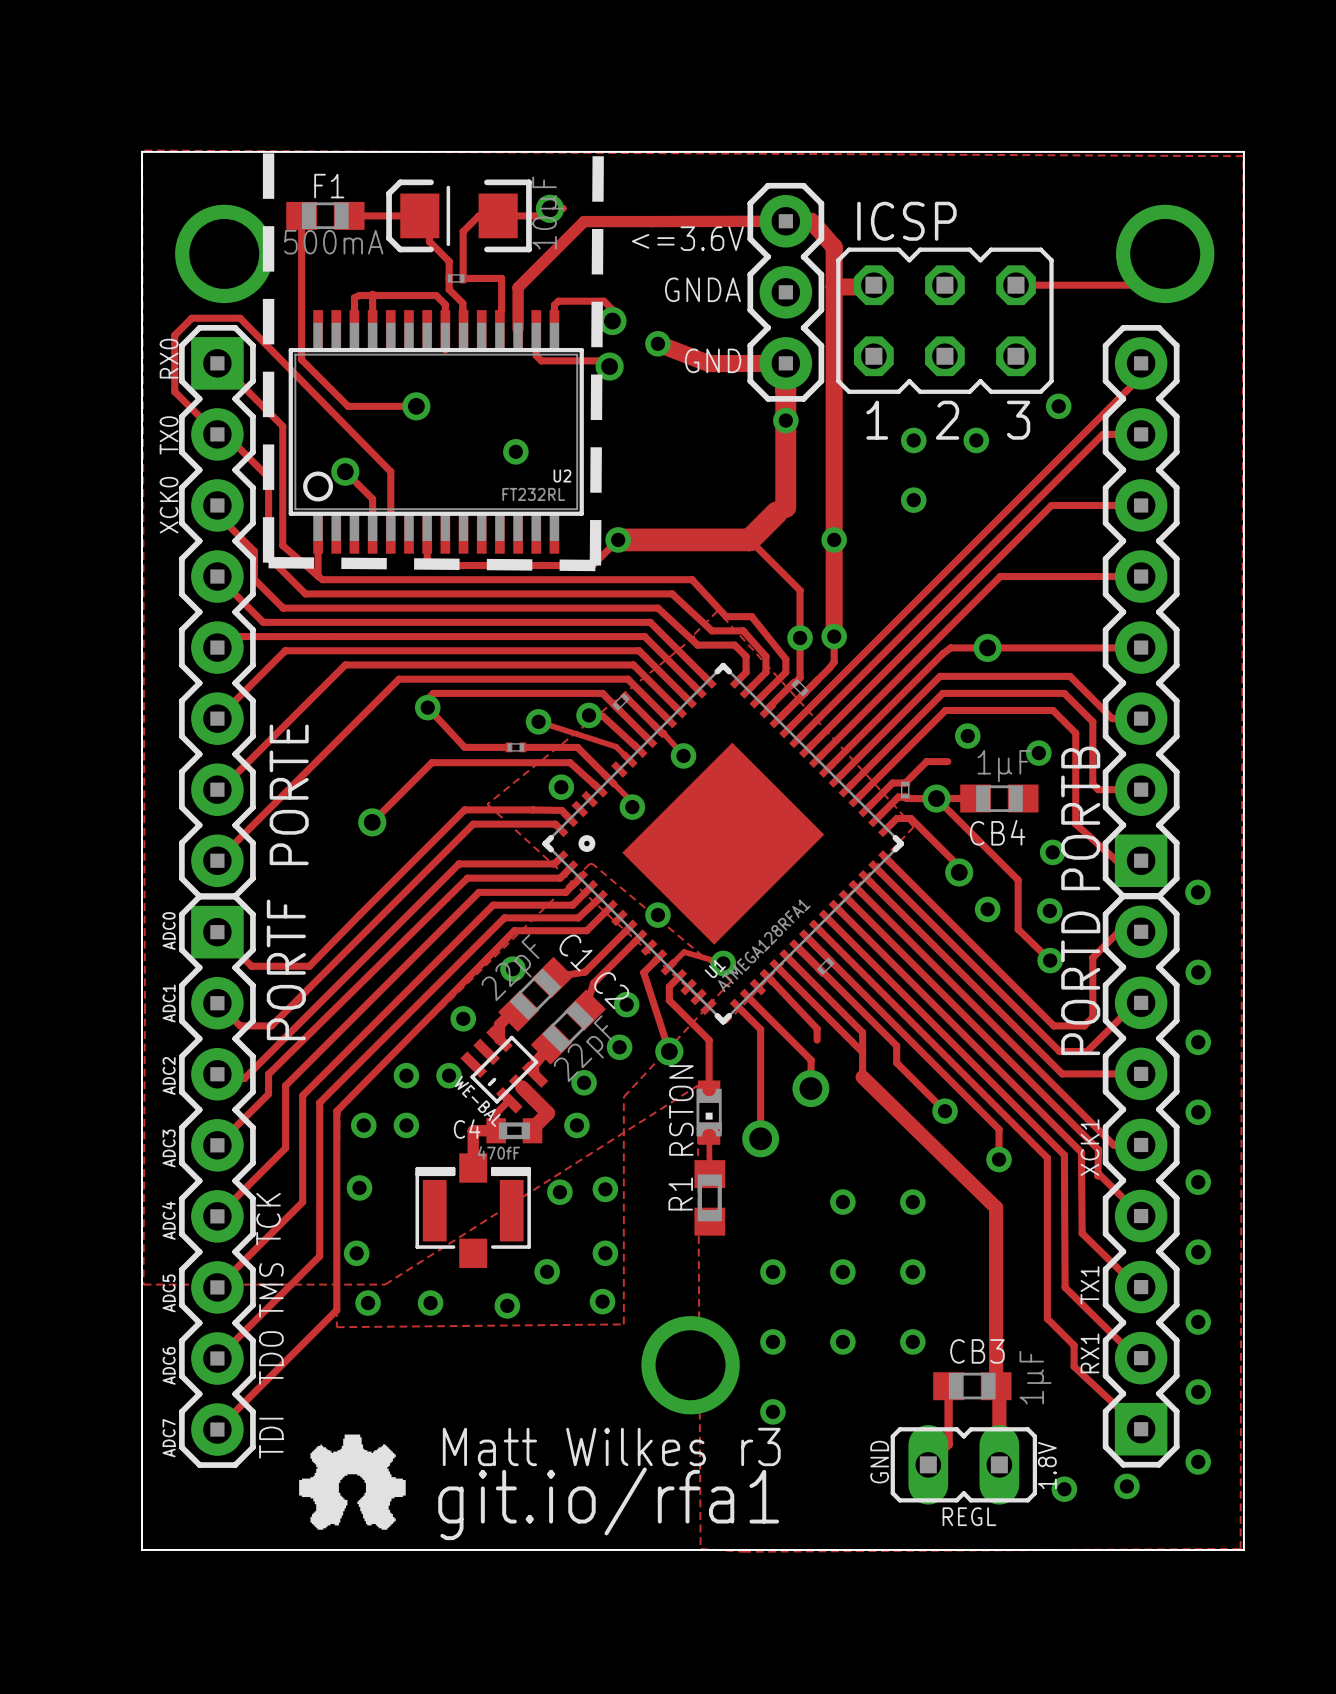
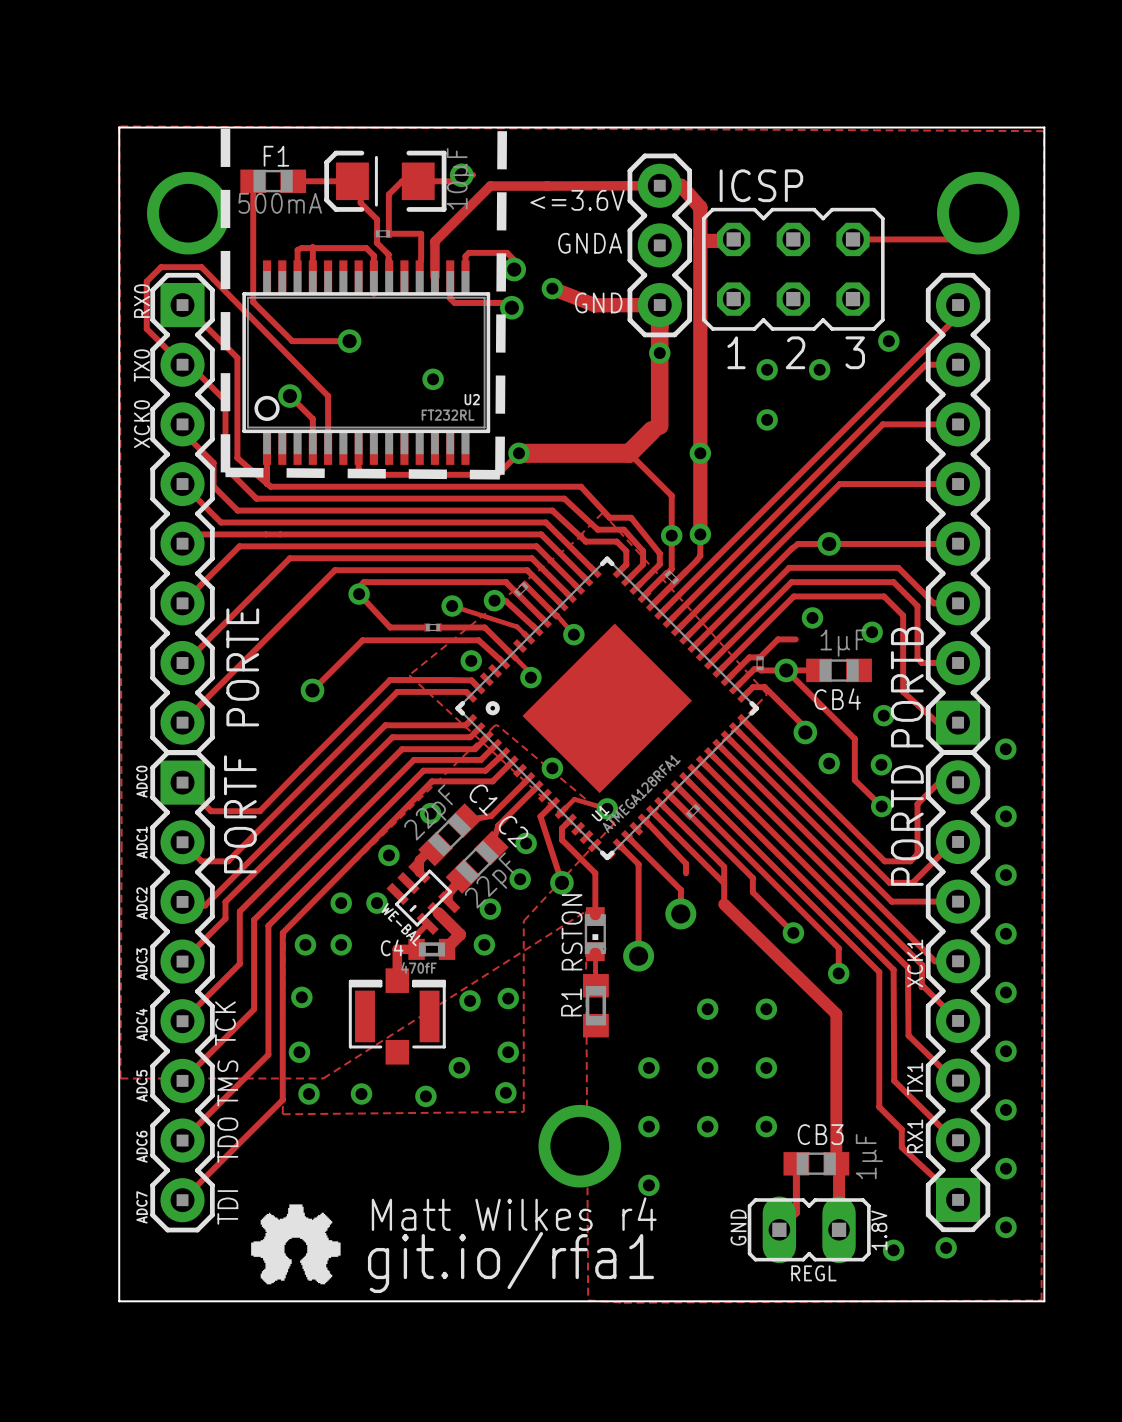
text: Matt Wilkes r3 (611, 1446) -> Matt Wilkes r4 (514, 1214)

